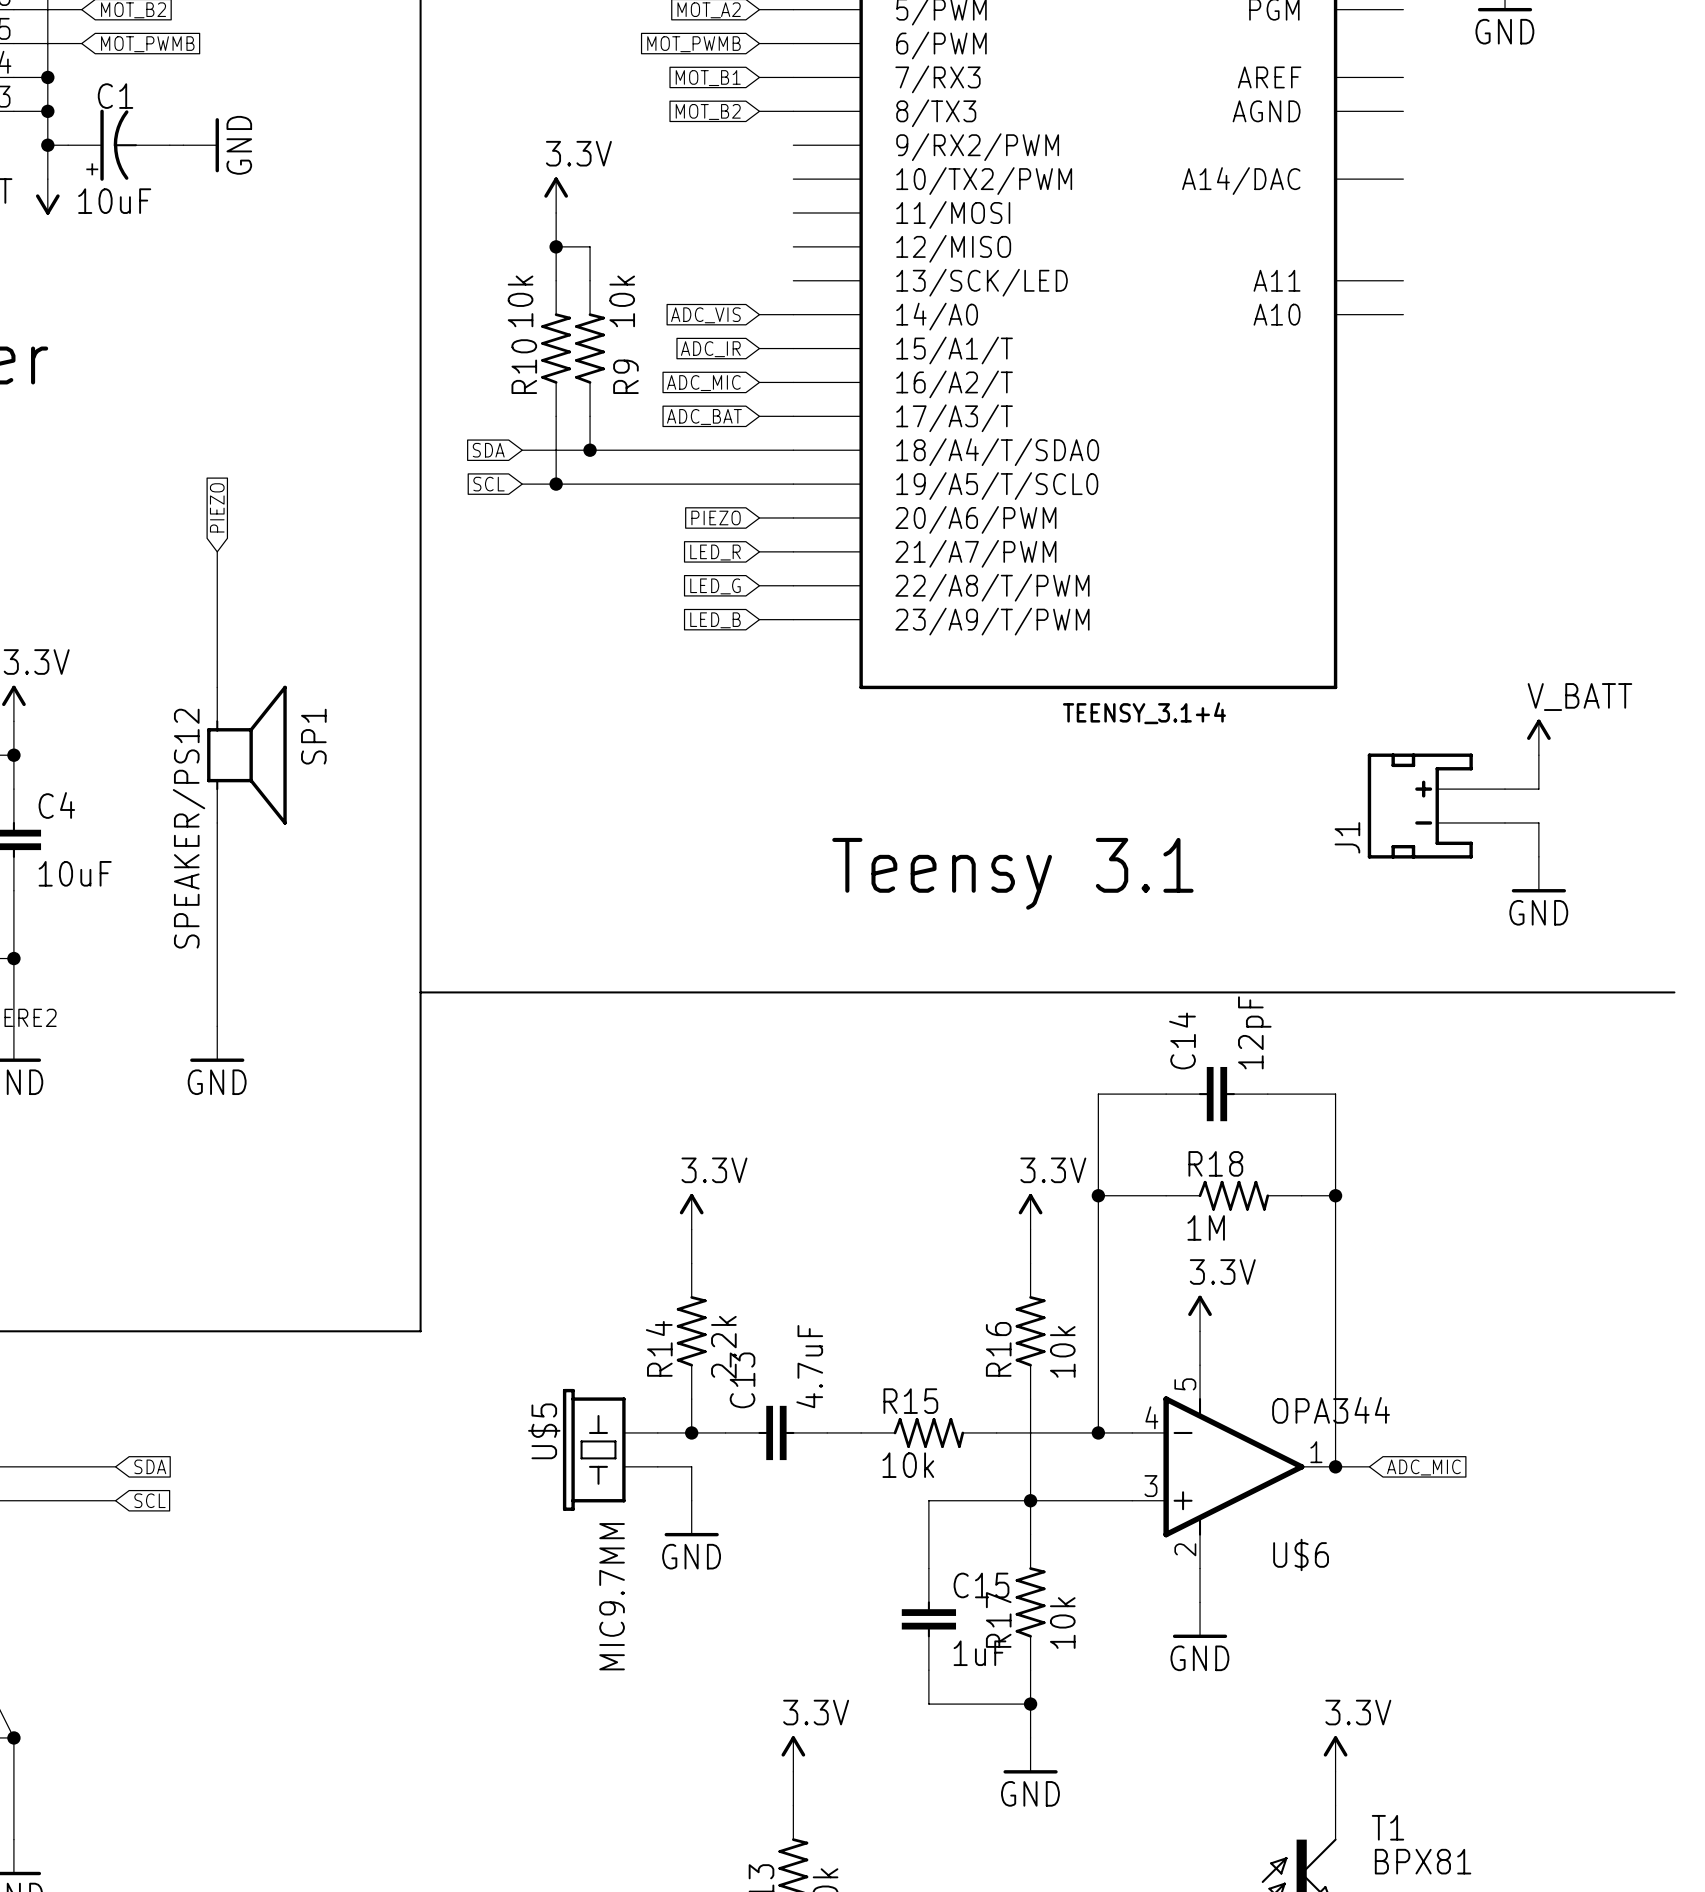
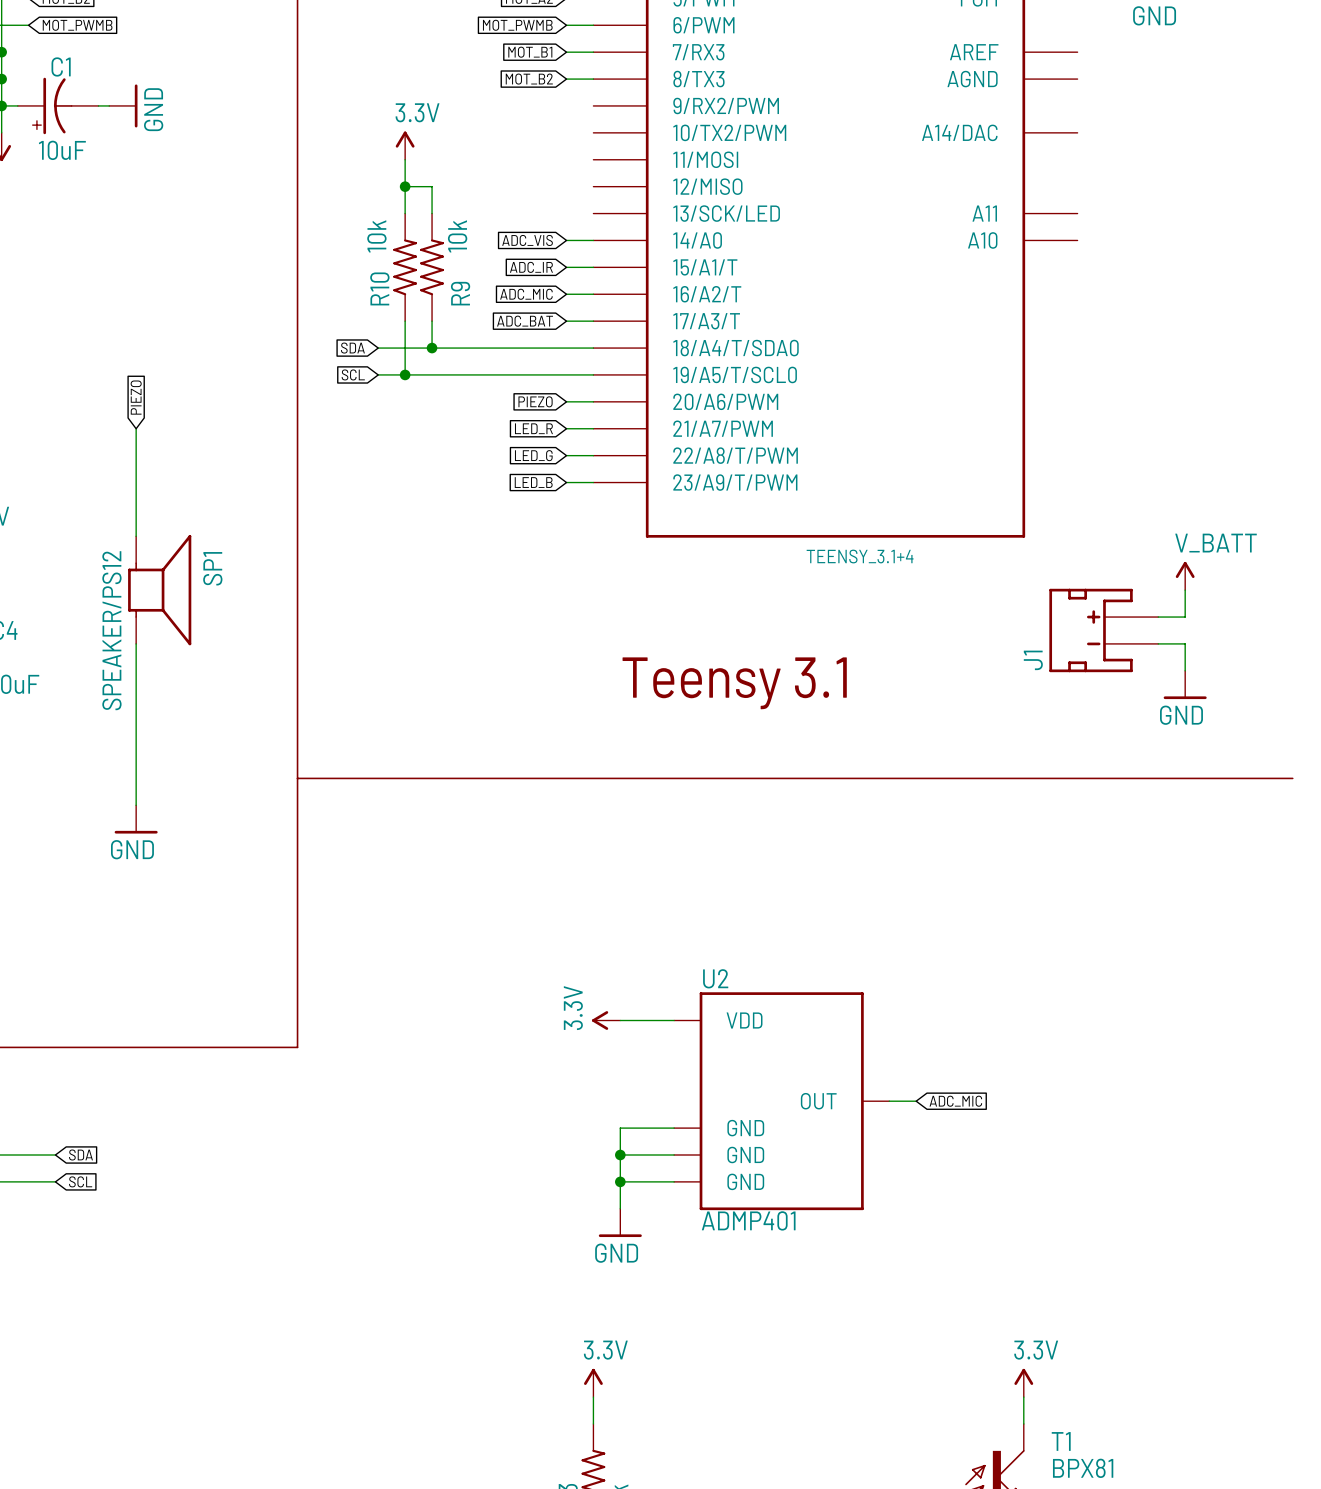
wire: (1166, 1094) (1098, 1094) (1098, 1432) -> none
C14: 12pF (1216, 1094) -> none
wire: (1267, 1094) (1335, 1094) (1335, 1466) (1369, 1466) -> none
wire: (1098, 1195) (1166, 1195) -> (620, 1020) (674, 1020)
junction: (1098, 1195) -> none
R18: 1M (1233, 1195) -> none
wire: (1301, 1195) (1335, 1195) -> (889, 1101) (916, 1101)
junction: (1335, 1195) -> none
power symbol: 3.3V (691, 1211) -> none
power symbol: 3.3V (1030, 1211) -> none
wire: (691, 1229) (691, 1263) -> none
wire: (1030, 1229) (1030, 1263) -> none
power symbol: none -> 3.3V (606, 1020)
power symbol: 3.3V (1200, 1313) -> none
R14: 2.2k (691, 1331) -> none
R16: 10k (1030, 1331) -> none
wire: (1200, 1331) (1200, 1365) -> none
wire: (691, 1399) (691, 1432) -> none
wire: (1030, 1399) (1030, 1534) -> none
U2: none -> ADMP401 (781, 1101)
wire: (657, 1432) (725, 1432) -> (620, 1155) (674, 1155)
junction: (691, 1432) -> none
C13: 4.7uF (776, 1432) -> none
wire: none -> (620, 1128) (620, 1208)
R15: 10k (928, 1432) -> none
wire: (996, 1432) (1132, 1432) -> none
junction: (1098, 1432) -> none
U$5: MIC9.7MM (610, 1449) -> none
wire: (657, 1466) (691, 1466) (691, 1500) -> none
junction: none -> (620, 1155)
U$6: OPA344 (1233, 1466) -> none
junction: (1335, 1466) -> none
global label position: ADC_MIC (1423, 1467) -> ADC_MIC (955, 1101)
wire: none -> (620, 1181) (674, 1181)
junction: none -> (620, 1181)
junction: (1030, 1500) -> none
wire: (1132, 1500) (928, 1500) (928, 1568) -> none
power symbol position: GND (691, 1518) -> GND (620, 1222)
wire: (1200, 1568) (1200, 1602) -> none
R17: 10k (1030, 1602) -> none
C15: 1uF (928, 1619) -> none
power symbol: GND (1200, 1620) -> none
wire: (928, 1670) (928, 1704) (1030, 1704) -> none
wire: (1030, 1670) (1030, 1737) -> none
junction: (1030, 1704) -> none
power symbol: GND (1030, 1755) -> none

